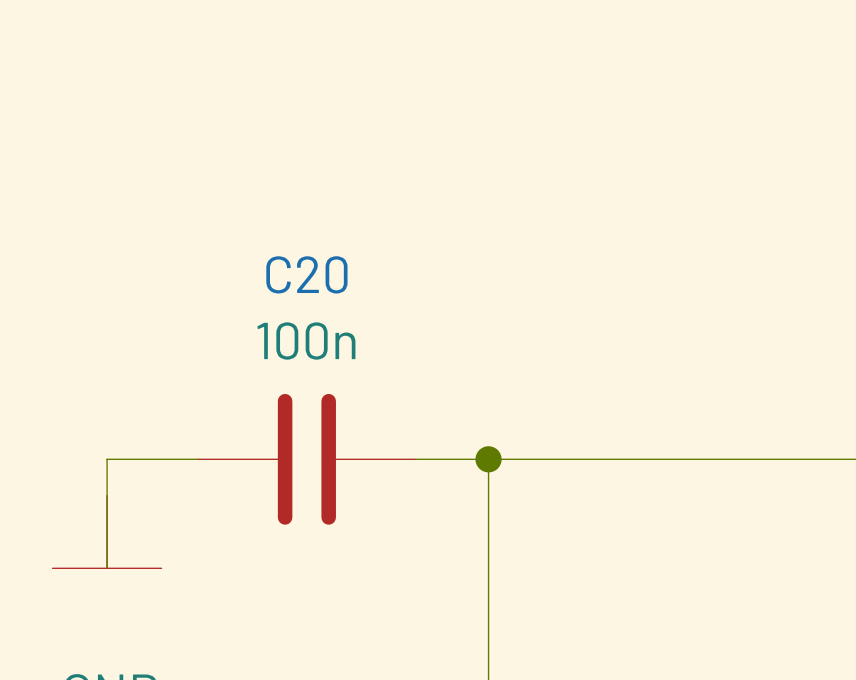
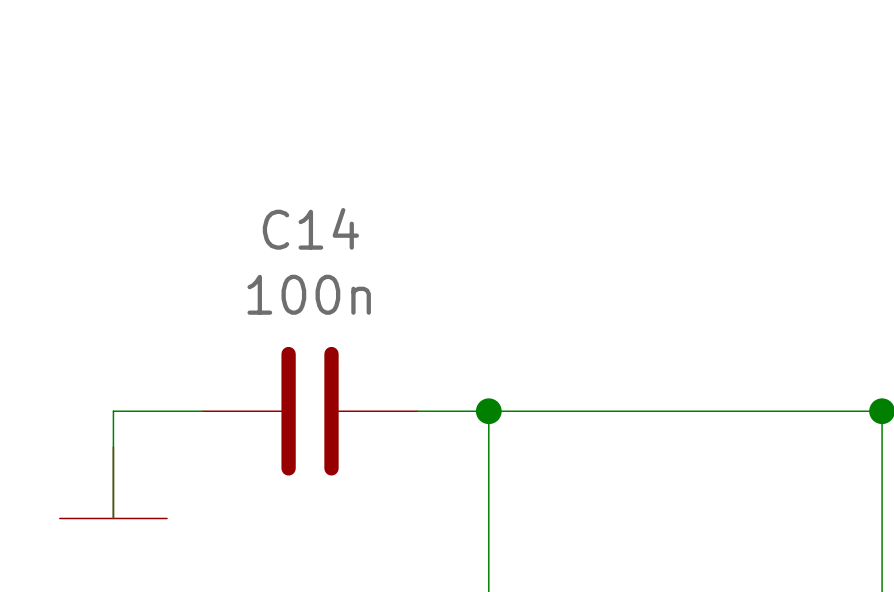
C20 name: C20 (306, 274) -> C14 (310, 228)

